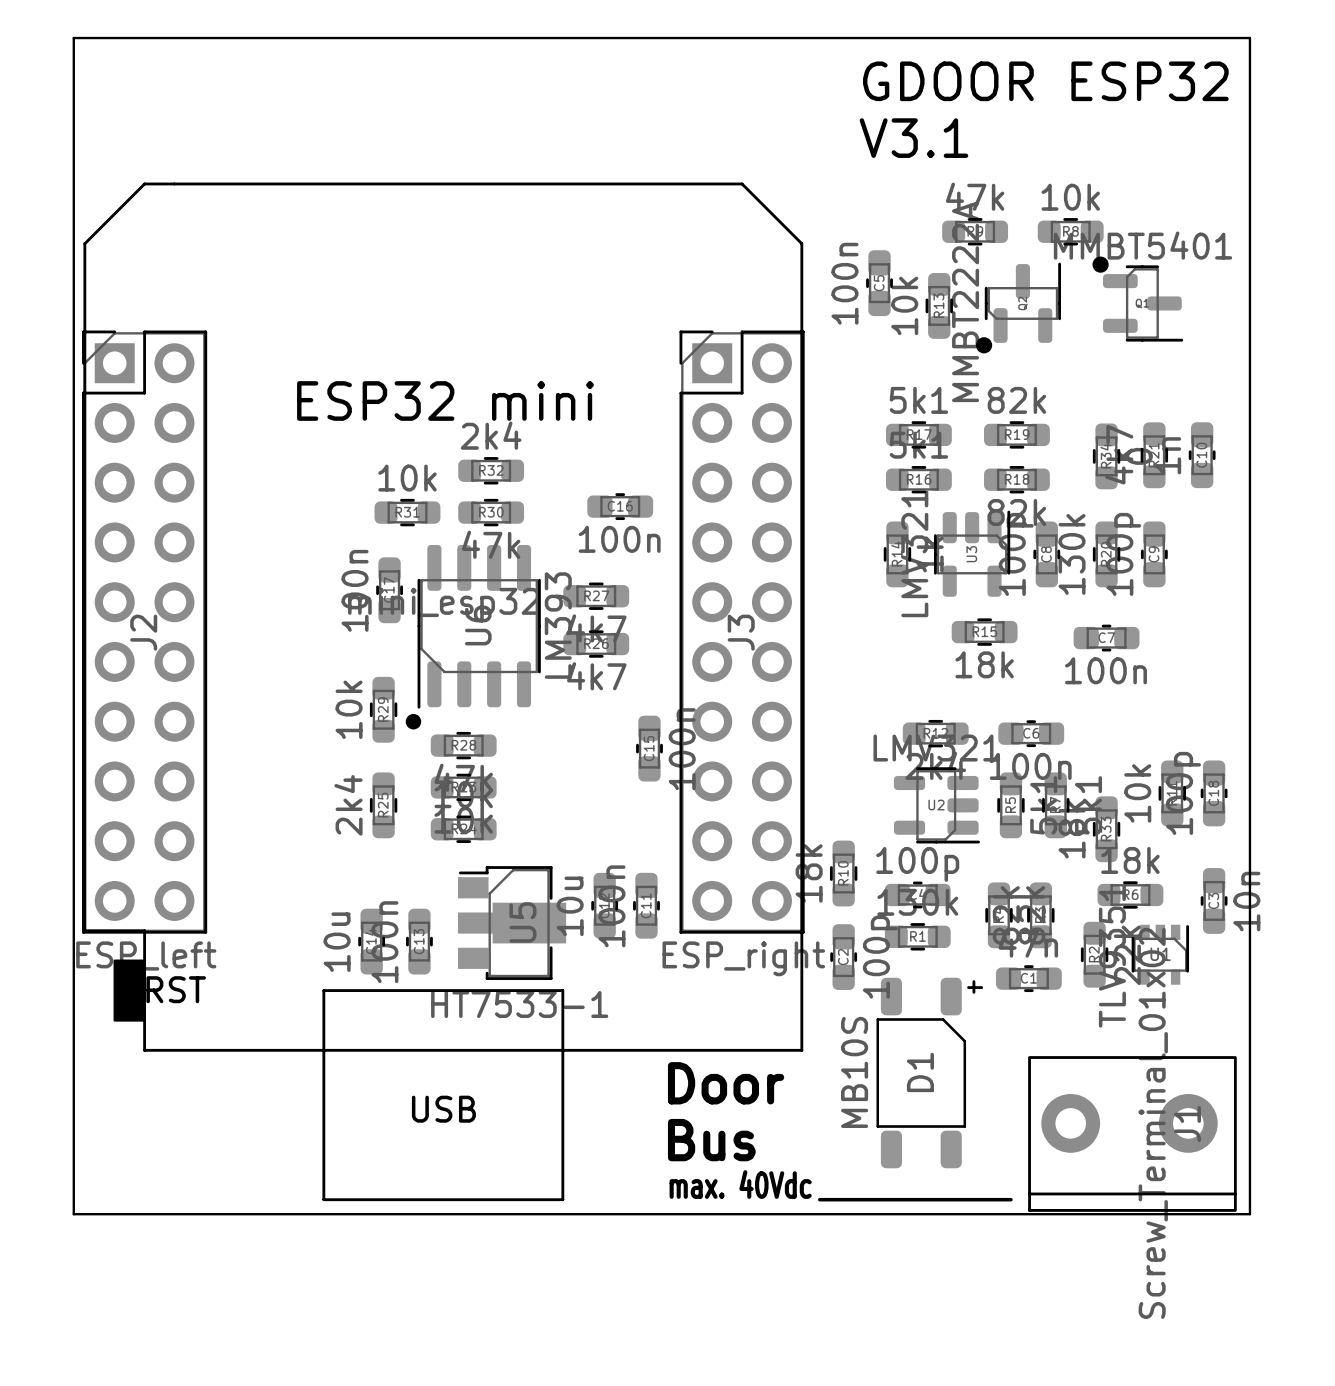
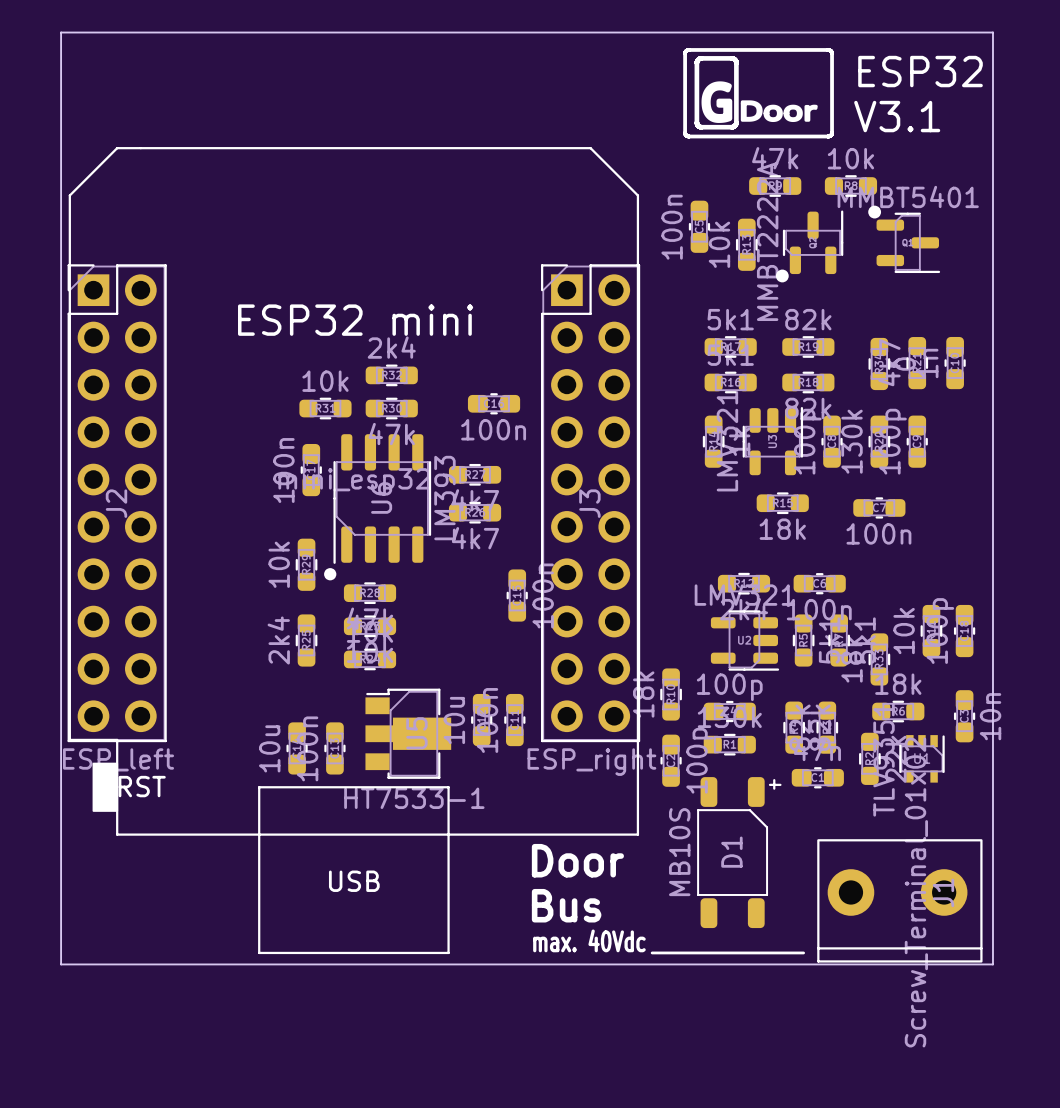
line: none -> (689, 49) (827, 49)
line: none -> (685, 53) (685, 133)
line: none -> (832, 53) (832, 133)
line: none -> (701, 58) (731, 58)
line: none -> (696, 63) (696, 122)
line: none -> (736, 63) (736, 122)
text: GDOOR ESP32 (1045, 81) -> ESP32 (920, 71)
drawing: none -> [701, 81, 818, 123]
text position: V3.1 (913, 138) -> V3.1 (897, 116)
line: none -> (701, 127) (731, 127)
line: none -> (689, 136) (827, 136)

